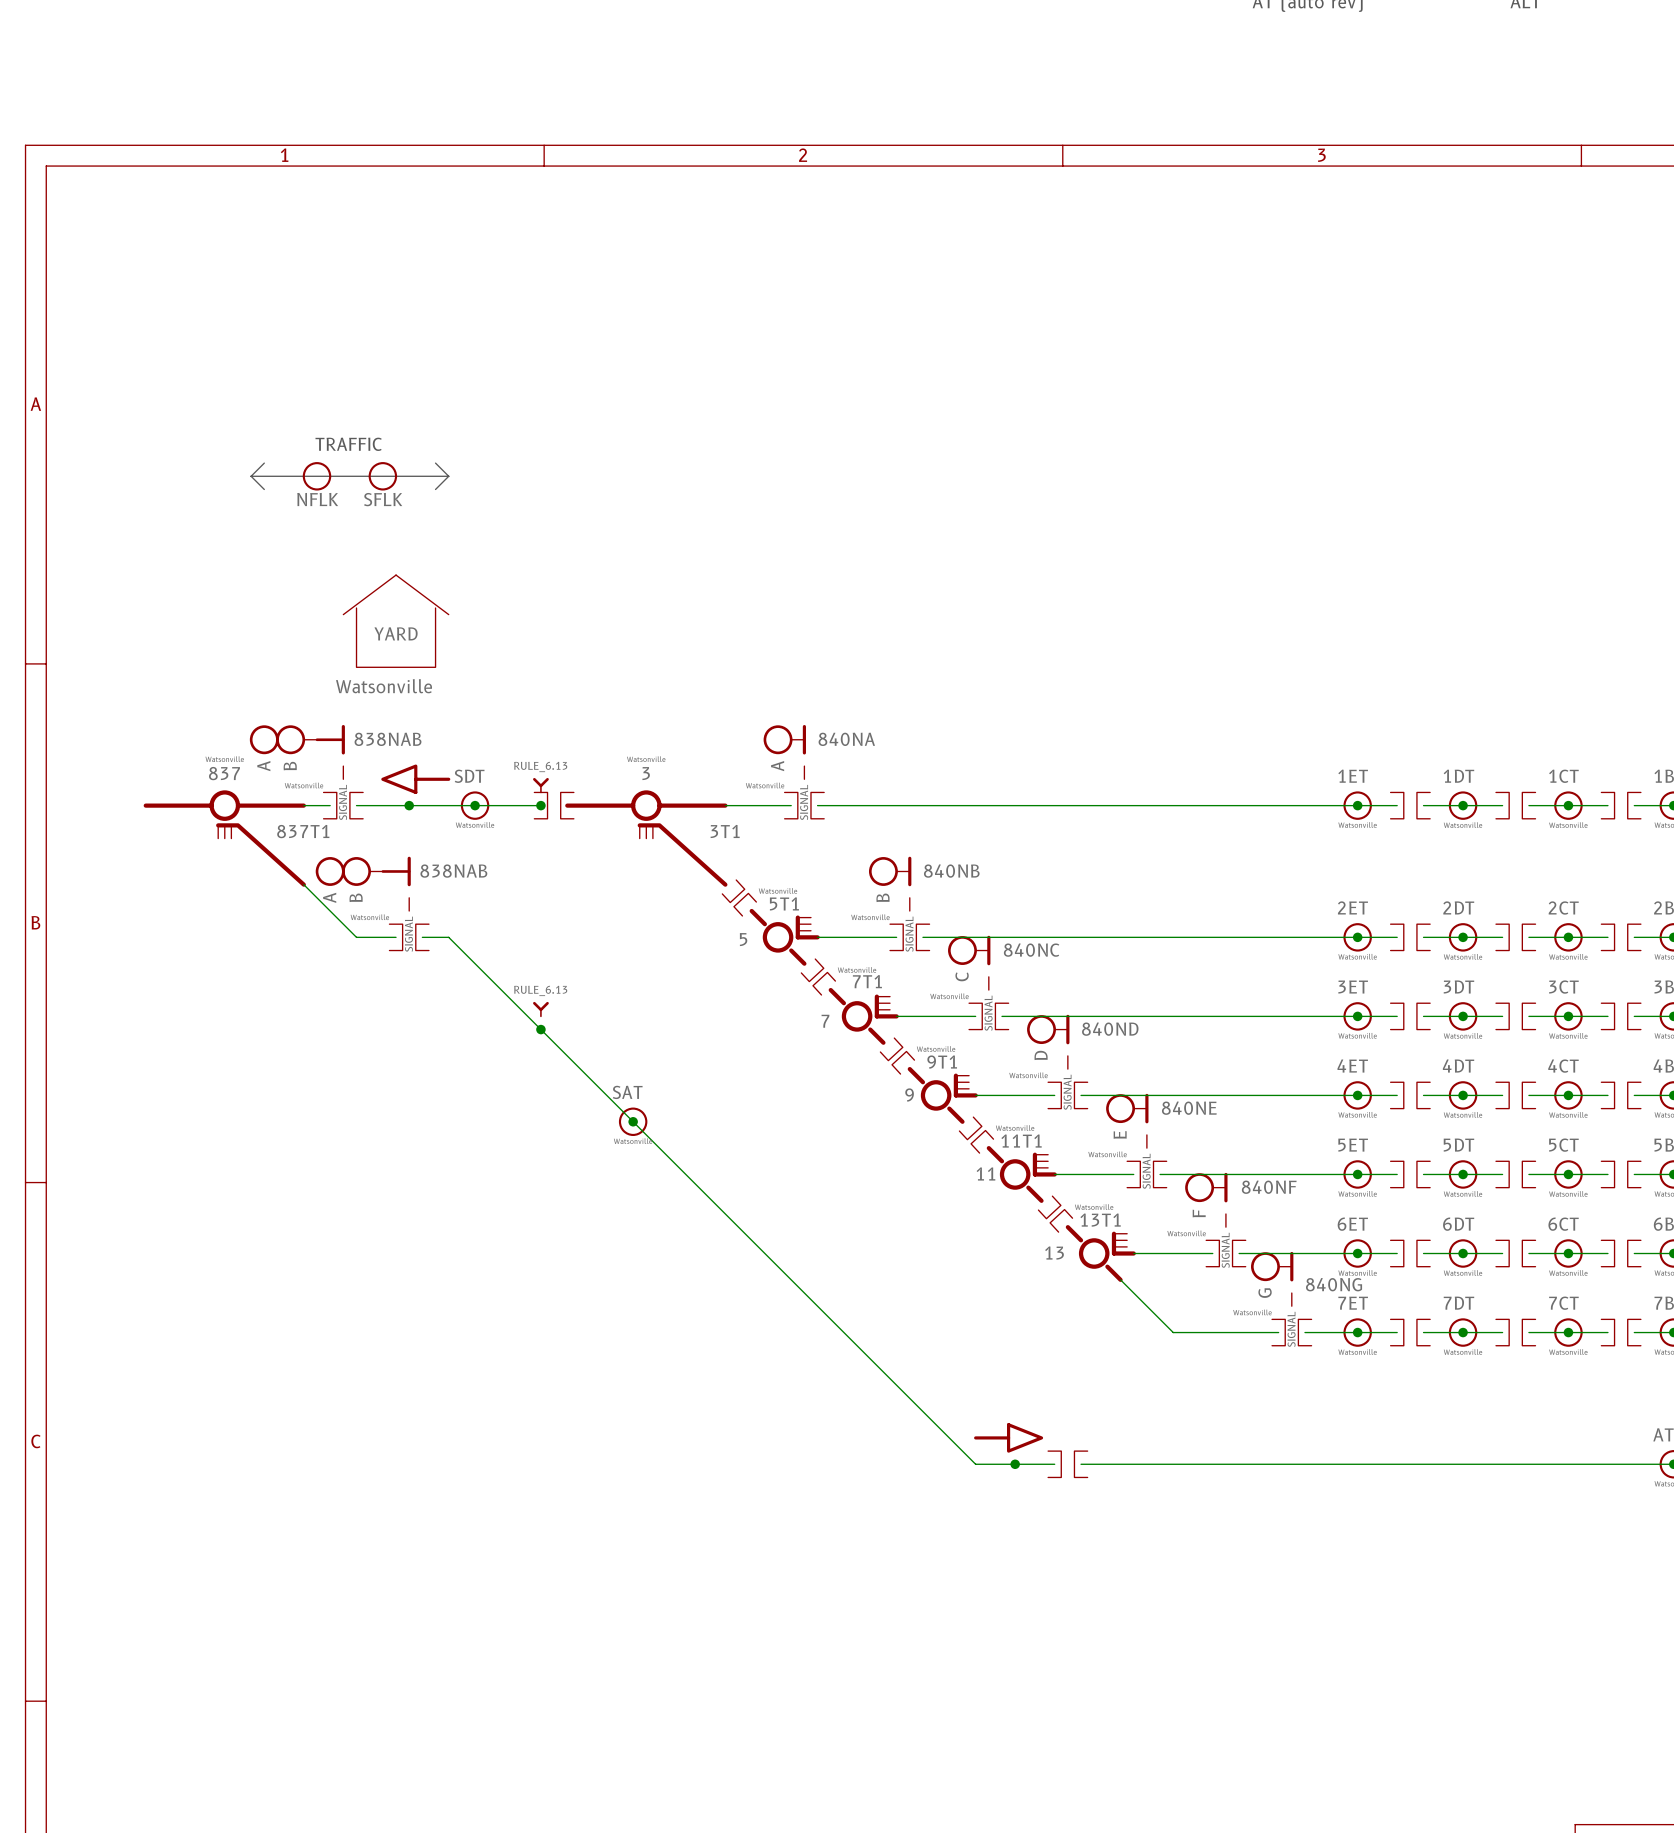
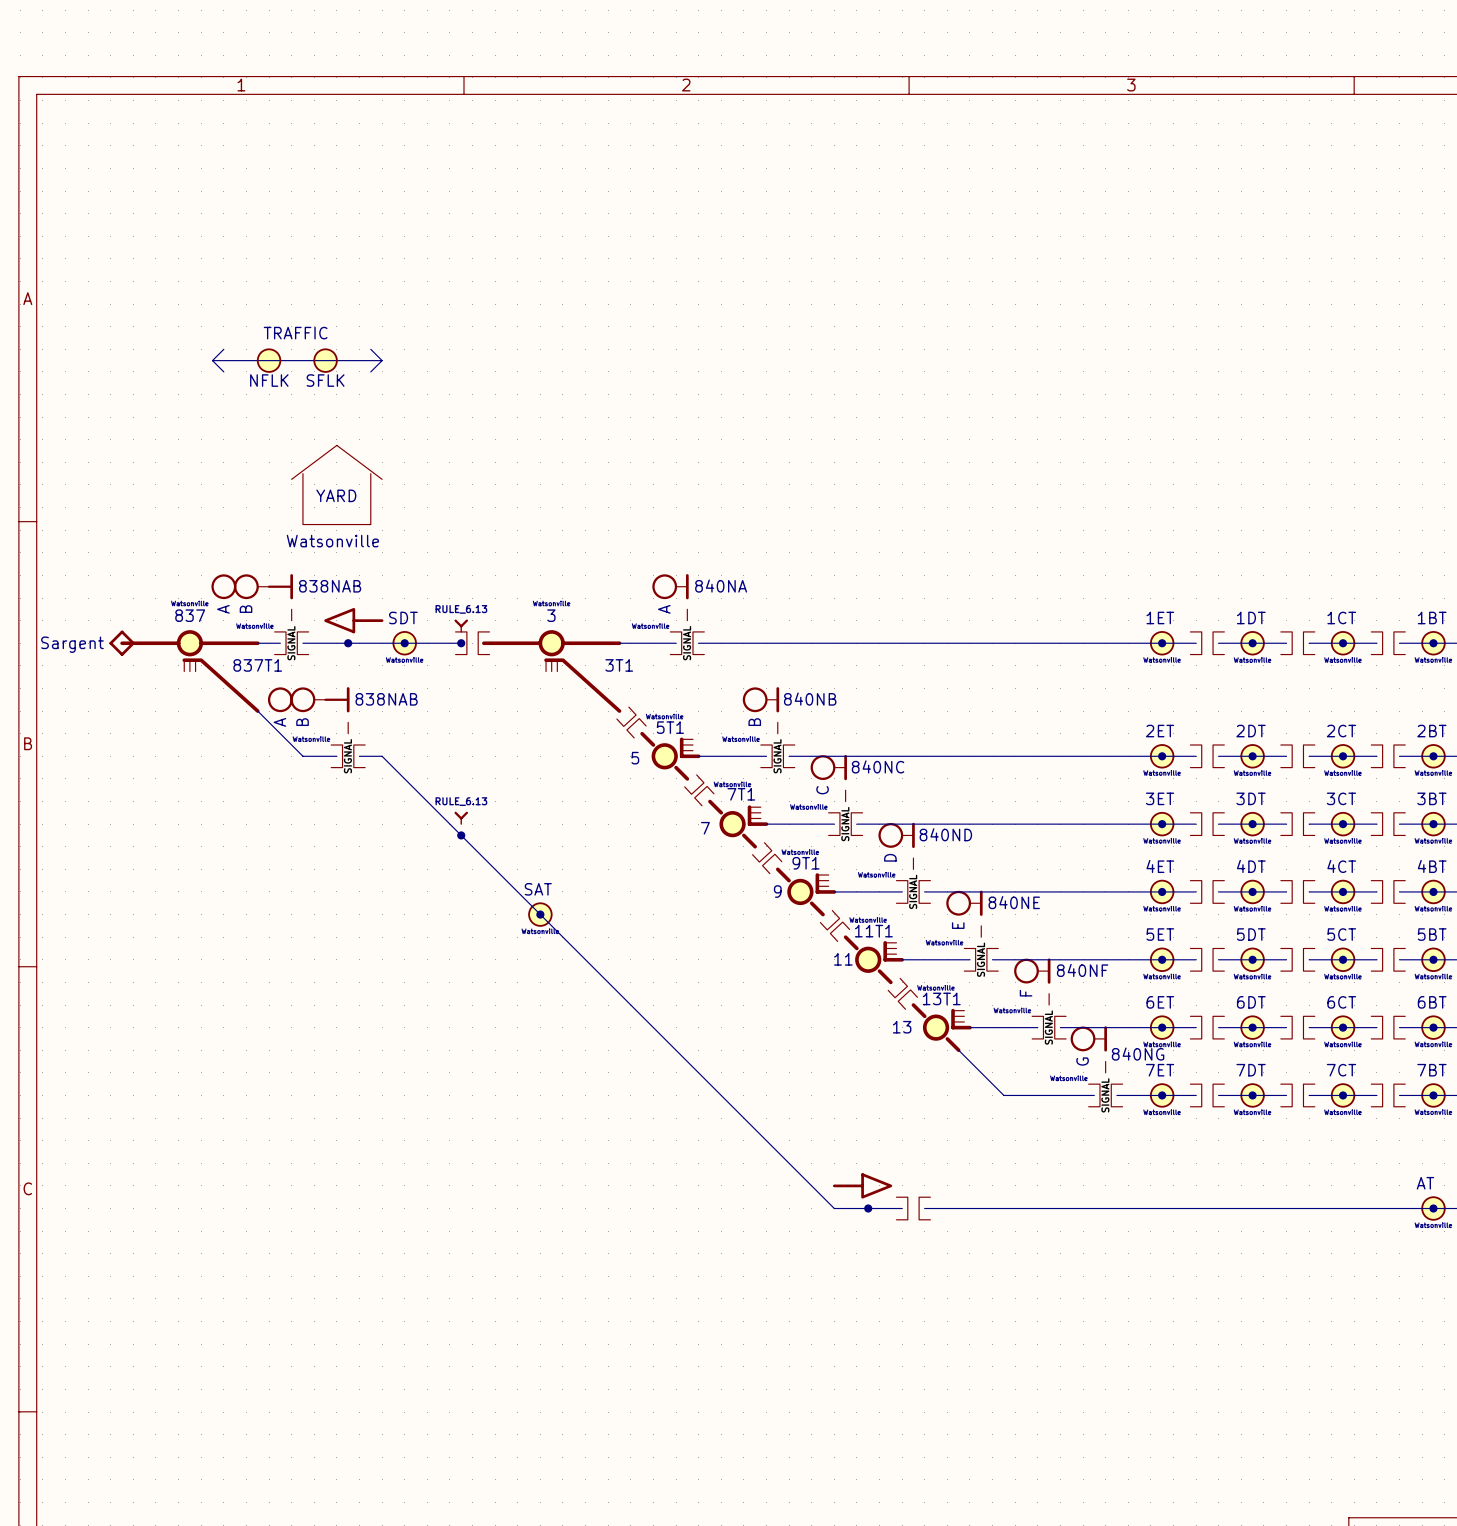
part: none -> Sargent (122, 643)

